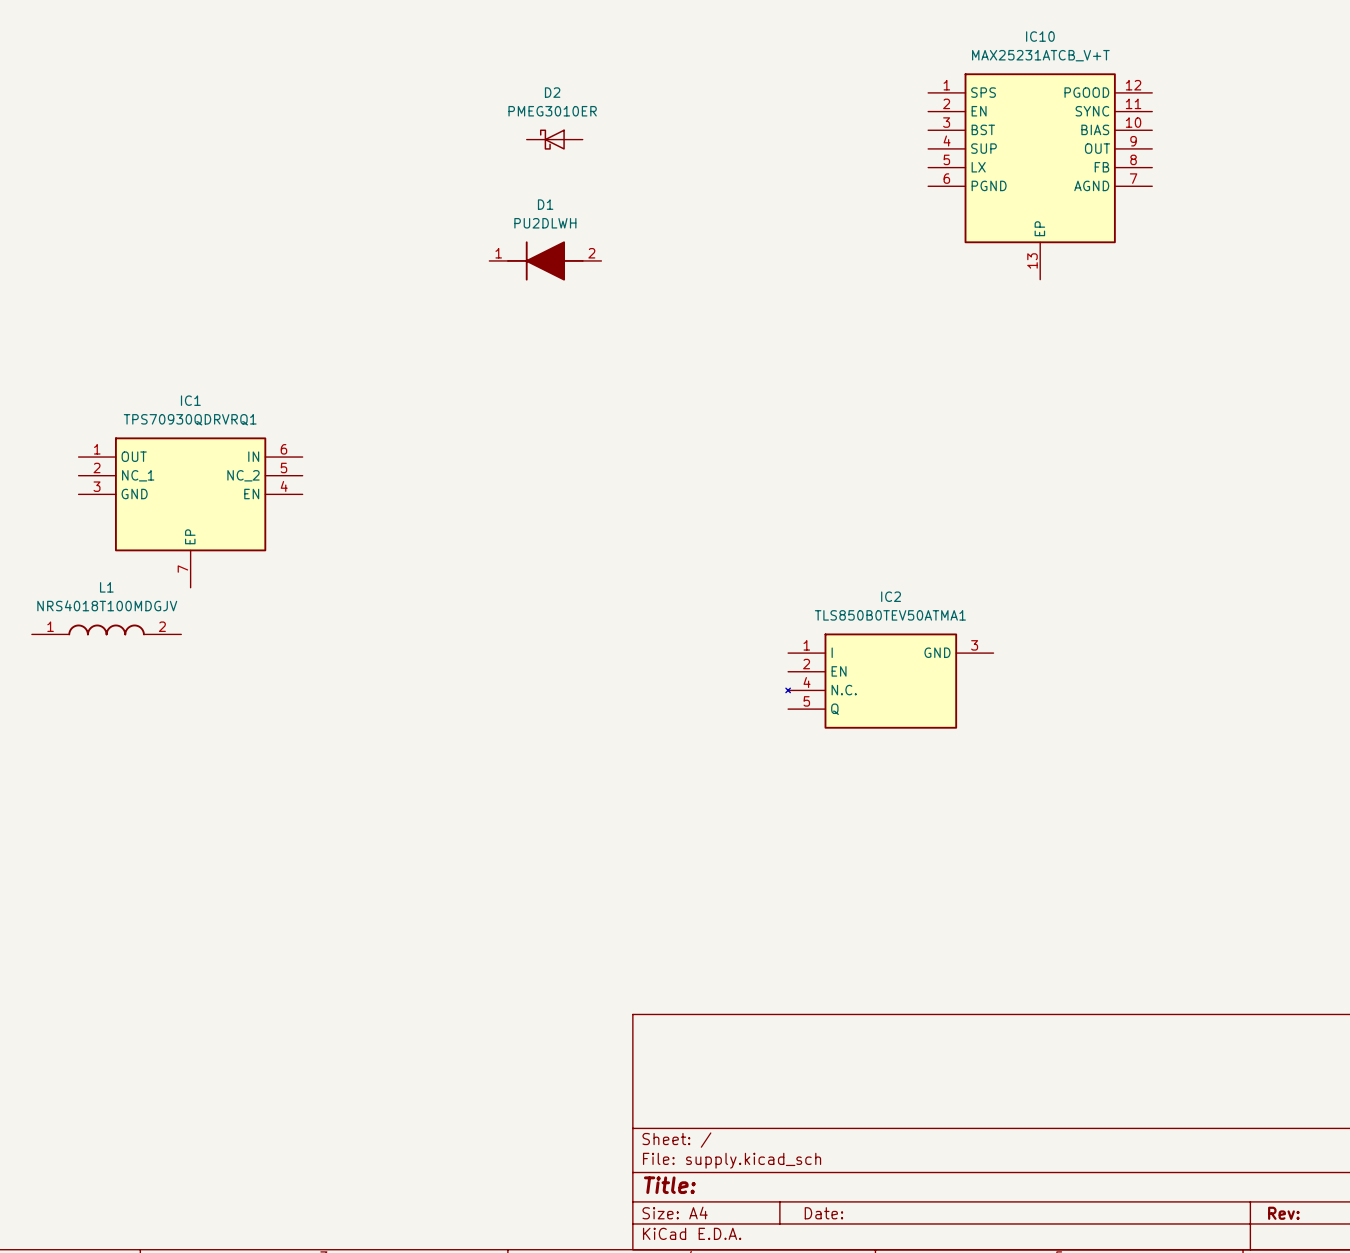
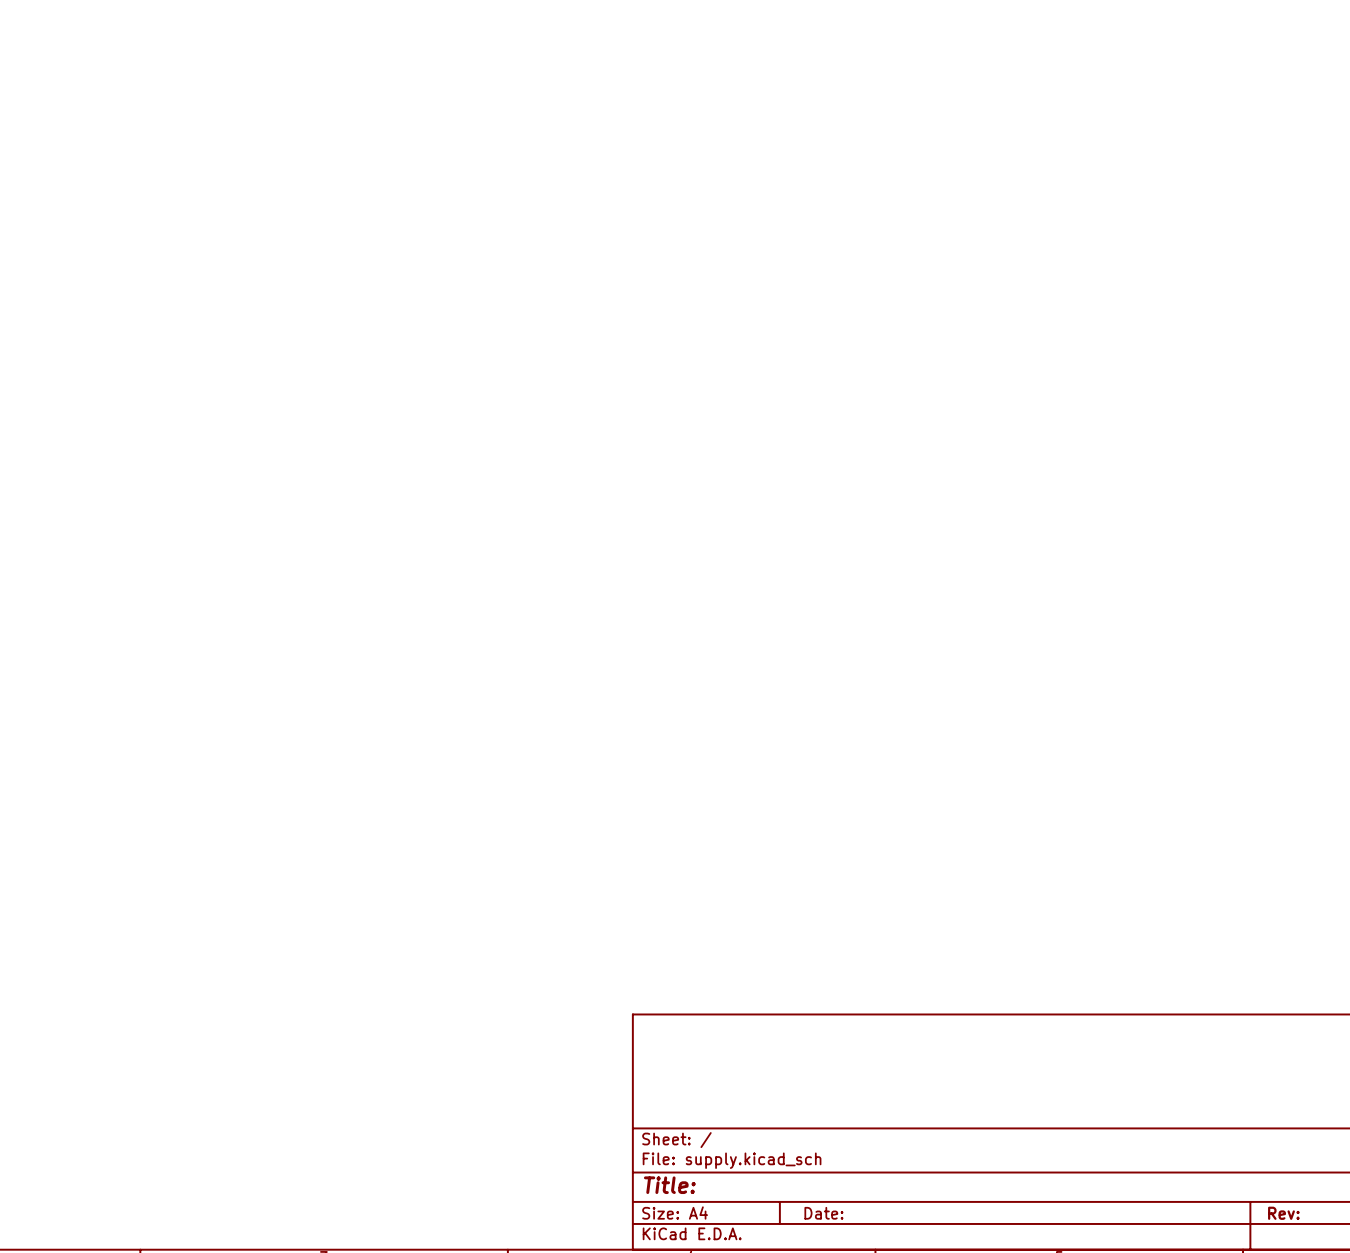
D2: PMEG3010ER (554, 139) -> none
IC10: MAX25231ATCB_V+T (1040, 176) -> none
D1: PU2DLWH (545, 260) -> none
IC1: TPS70930QDRVRQ1 (190, 512) -> none
L1: NRS4018T100MDGJV (106, 629) -> none
IC2: TLS850B0TEV50ATMA1 (889, 681) -> none

